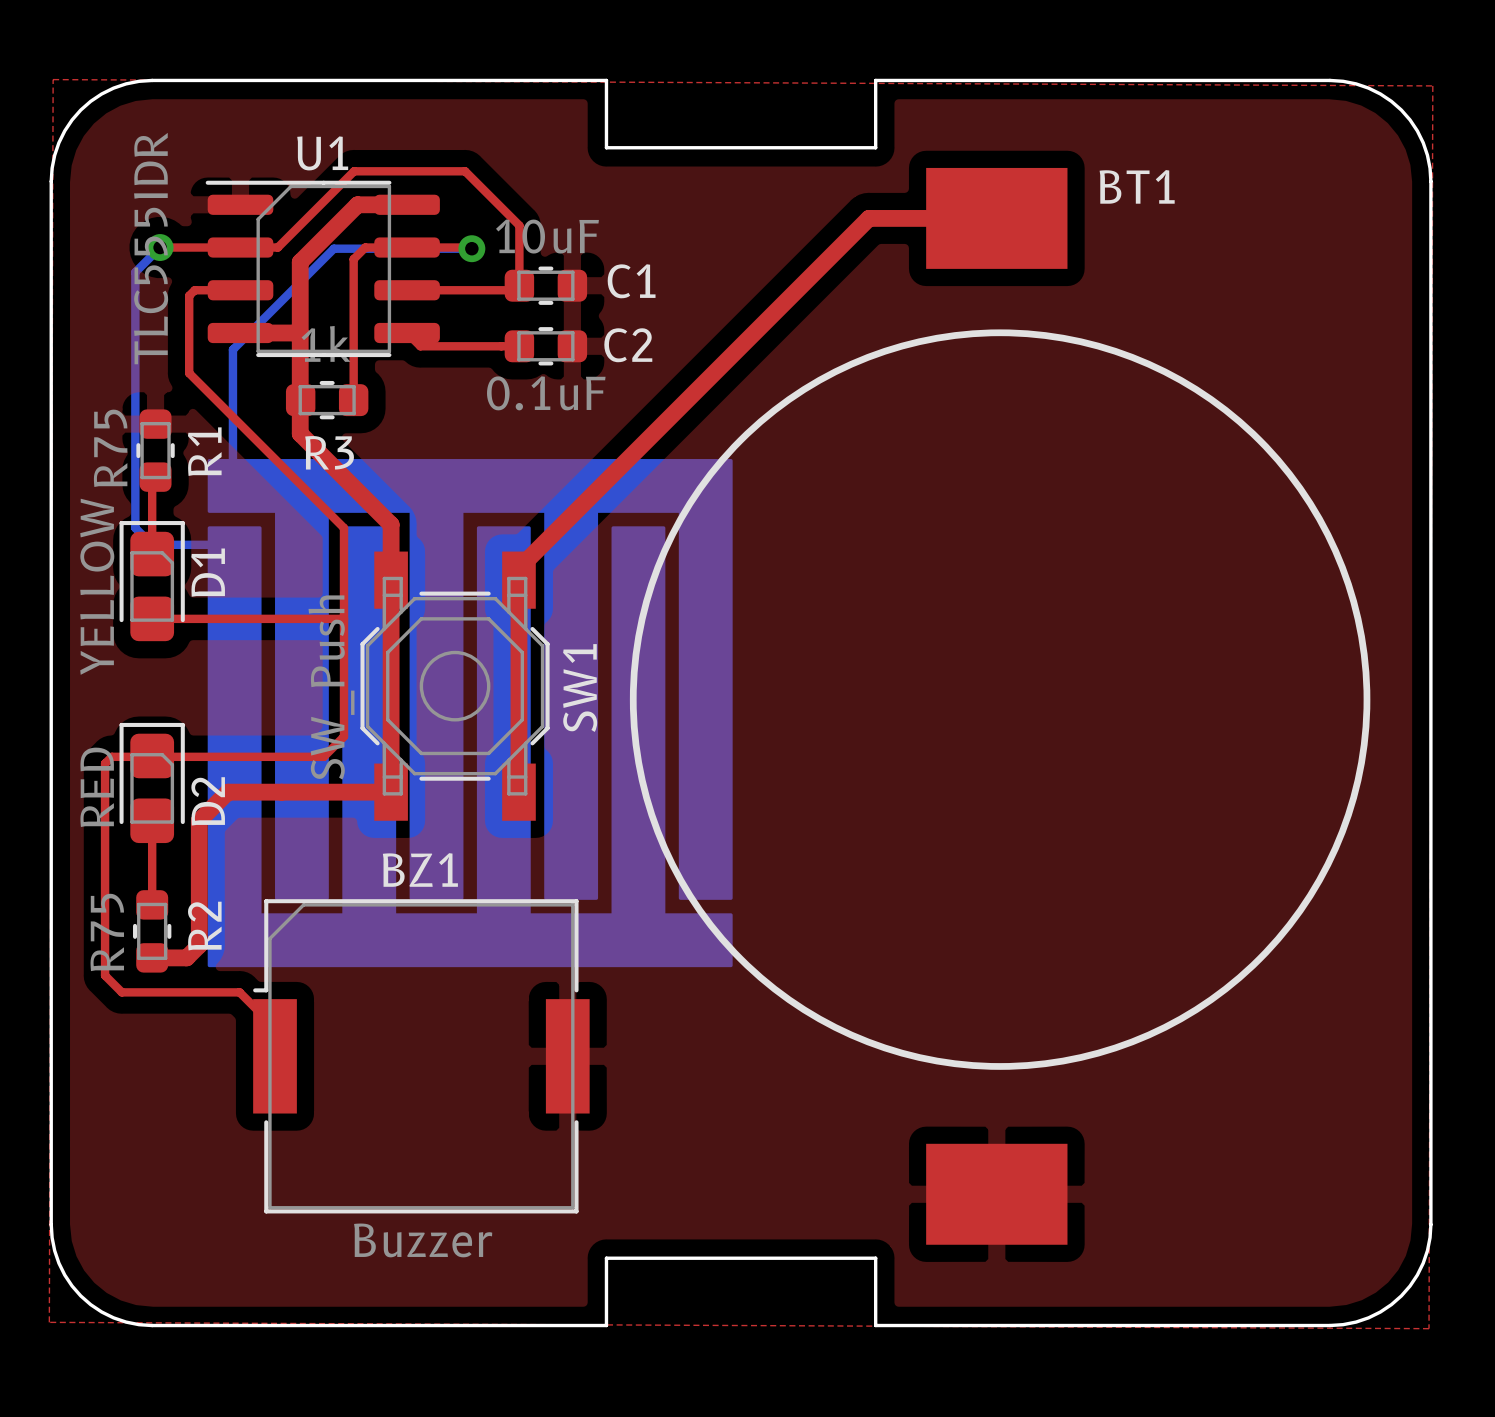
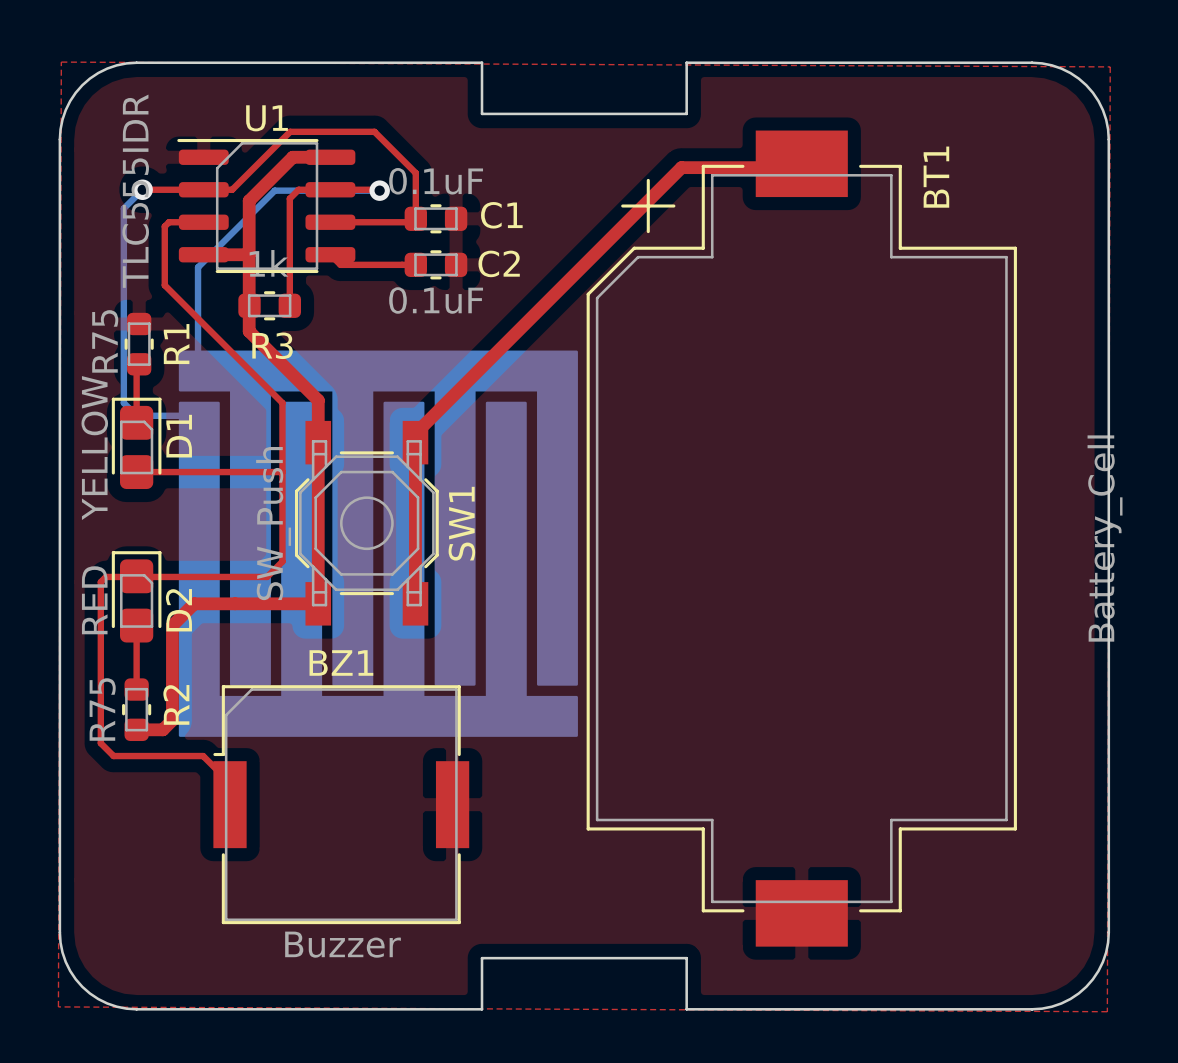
BT1 footprint: [926, 167, 1068, 1245] -> [586, 130, 1017, 947]
C1 value: 10uF (547, 236) -> 0.1uF (436, 181)
drawing: [629, 329, 1371, 1070] -> none
BT1 value: none -> Battery_Cell (1105, 538)

